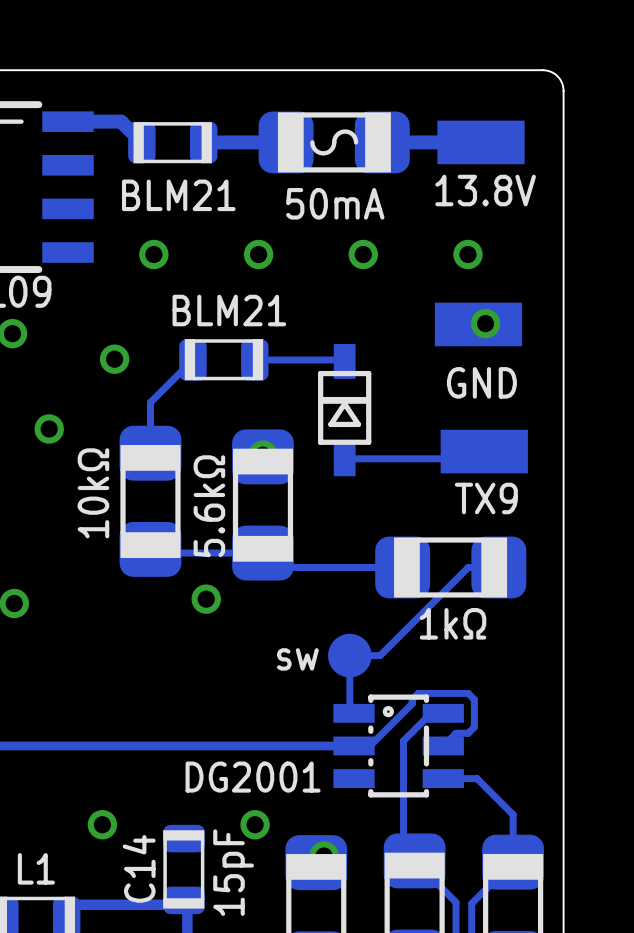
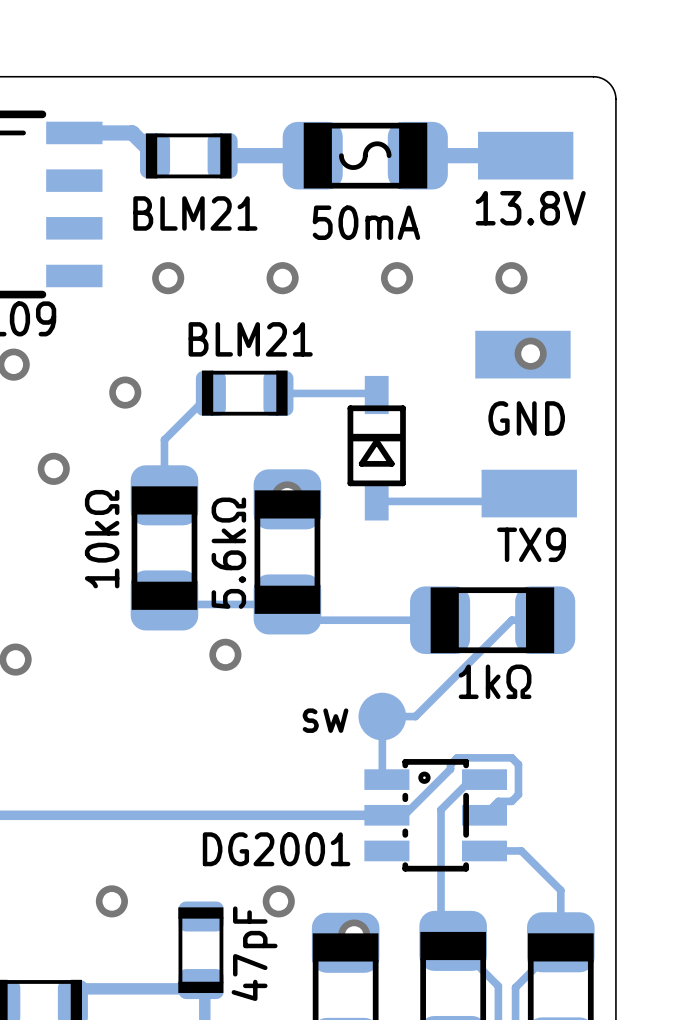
L1 name: L1 (36, 868) -> none
C14 name: C14 (139, 868) -> none
C14 value: 15pF (233, 872) -> 47pF (254, 953)

